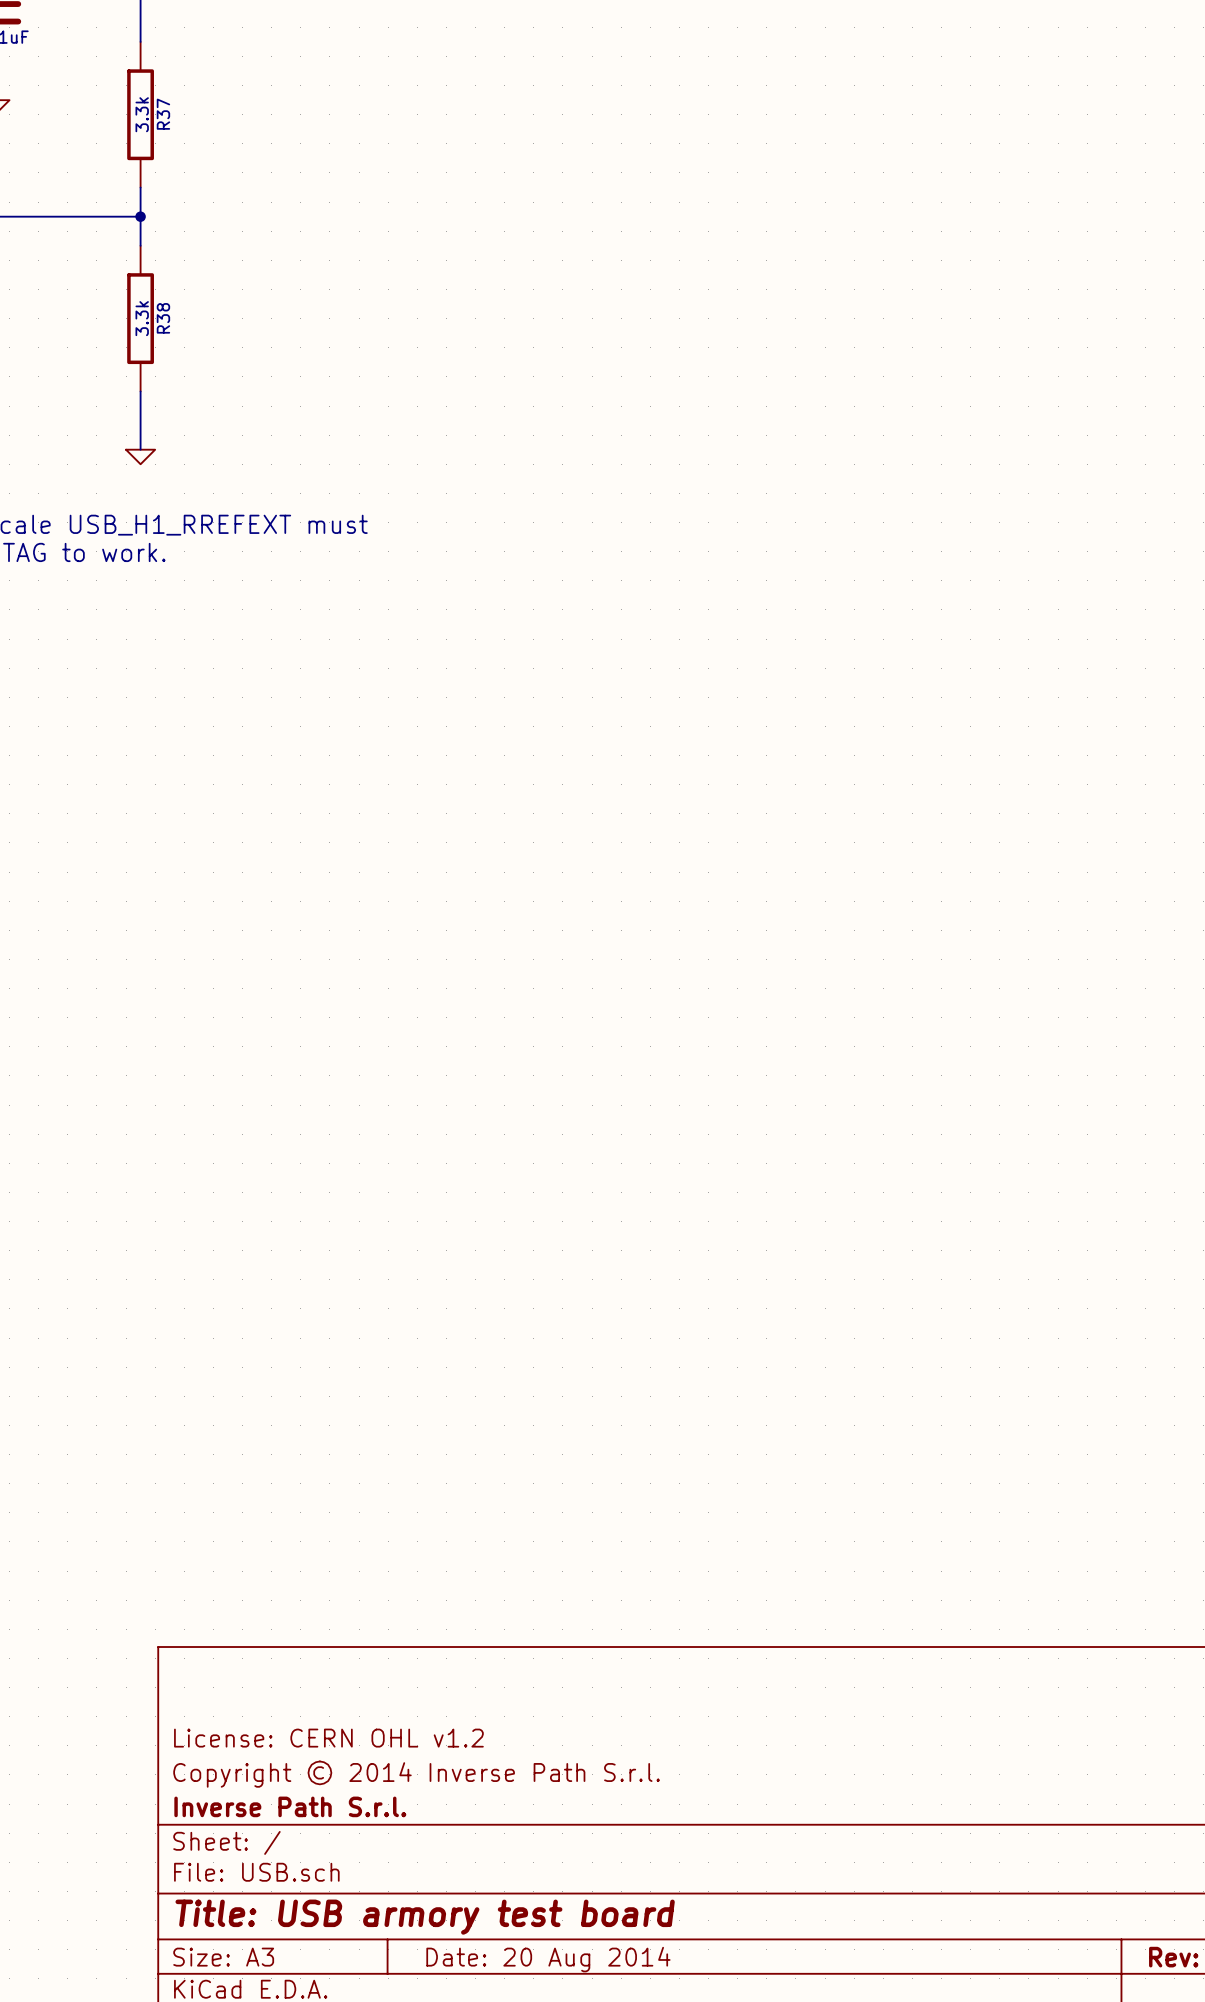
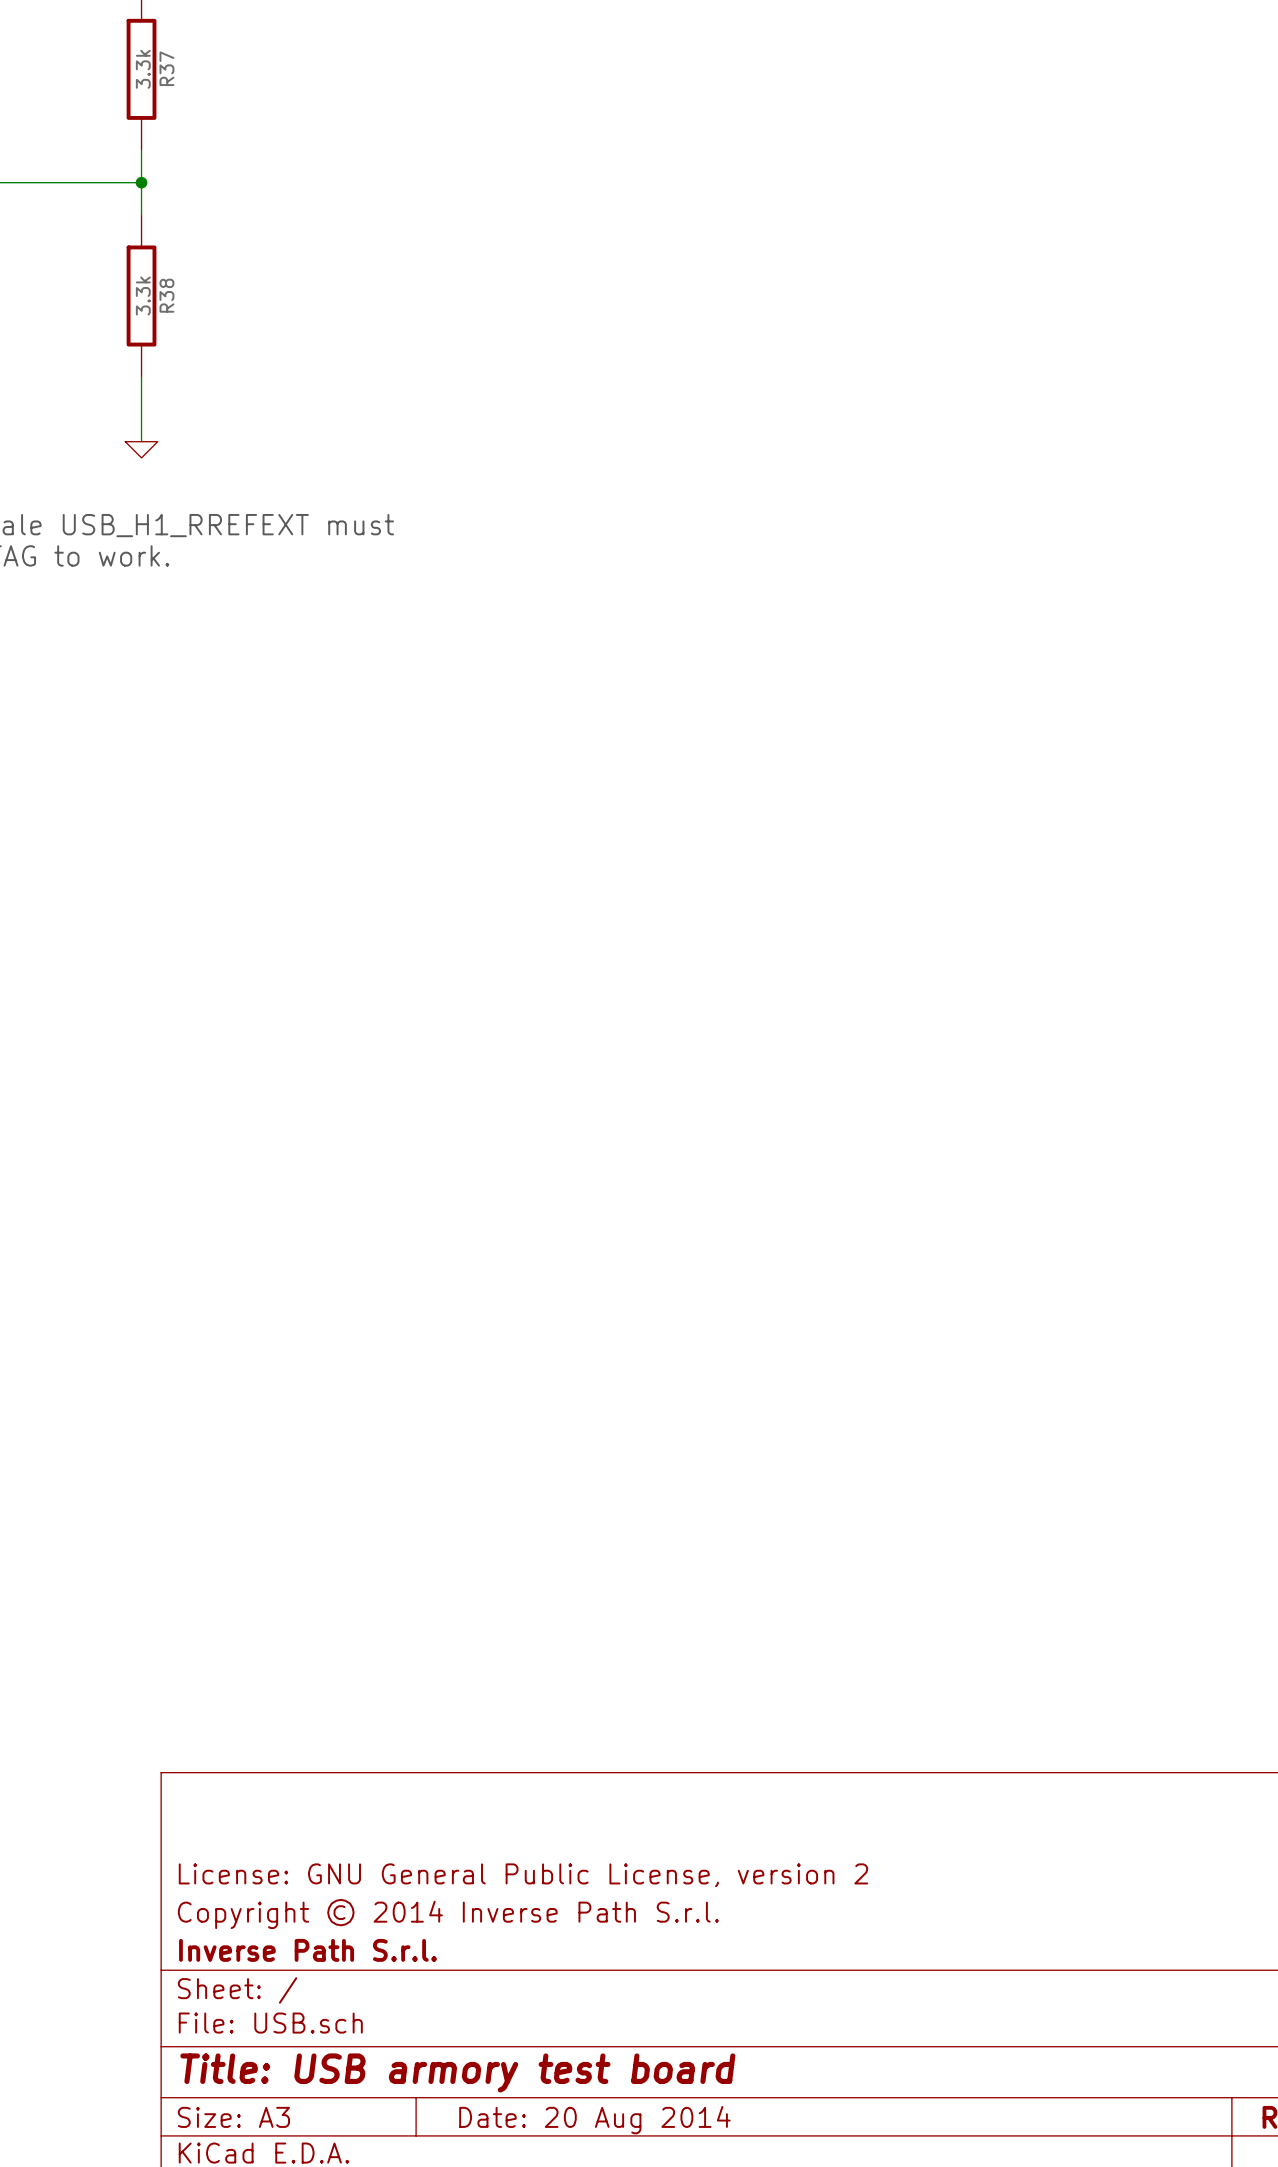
title block: License: CERN OHL v1.2 (328, 1738) -> License: GNU General Public License, version 2 (523, 1875)

